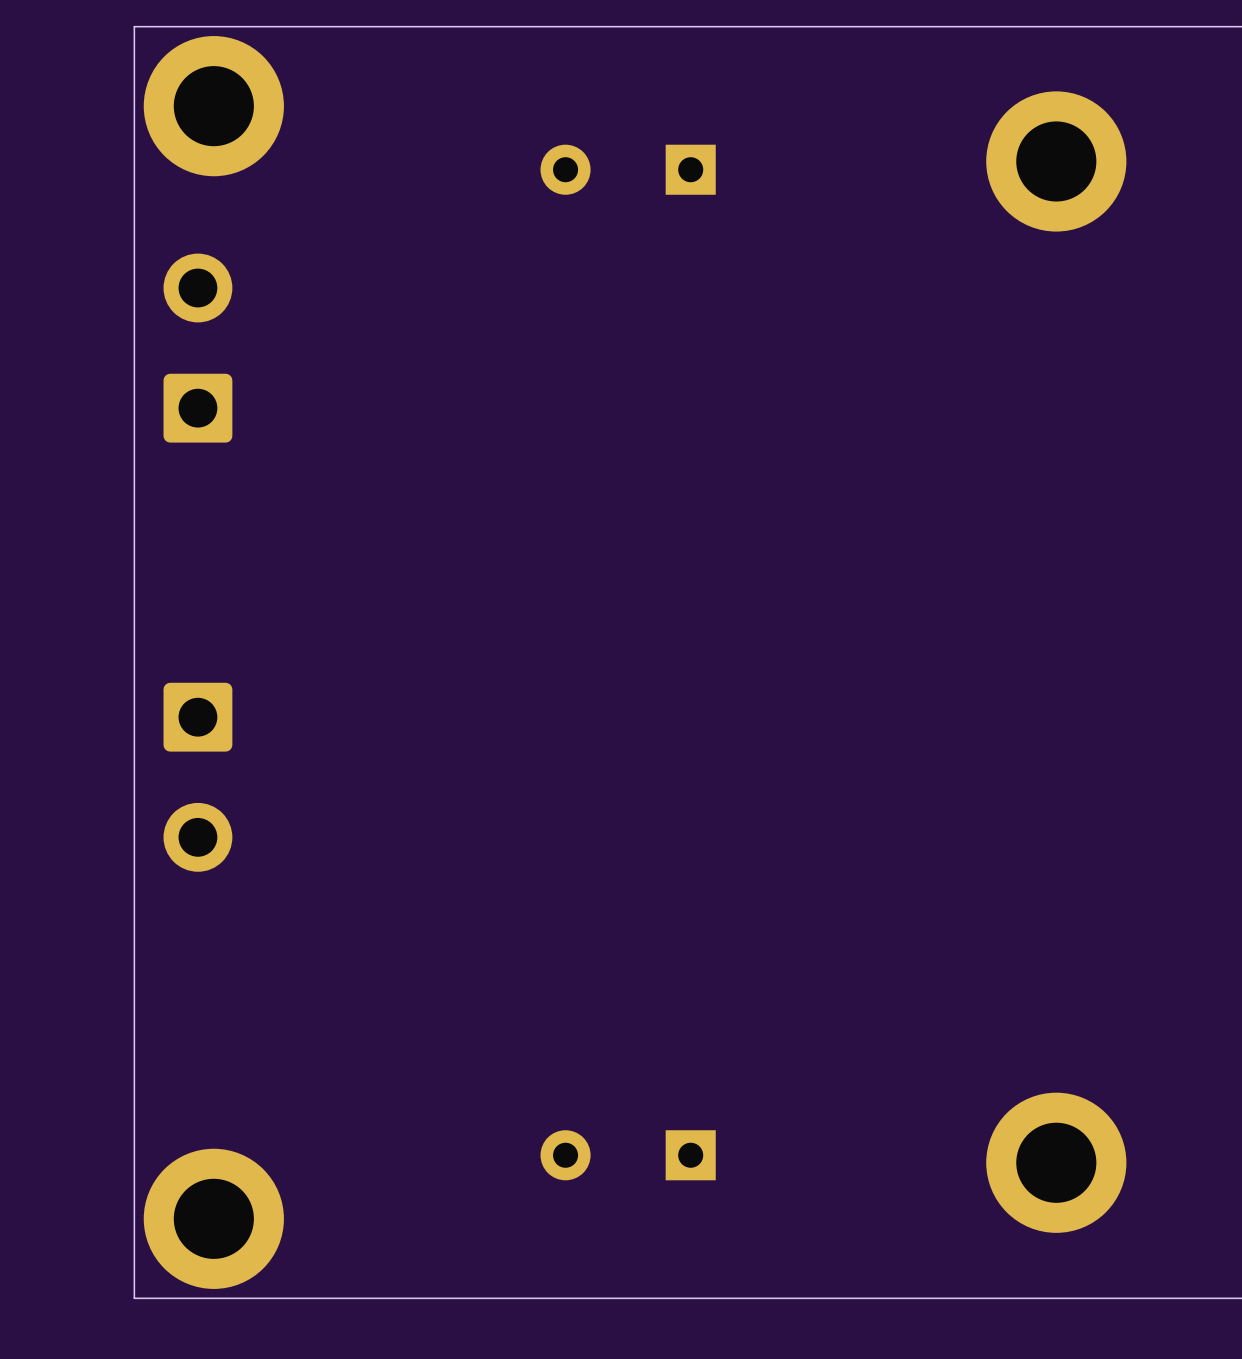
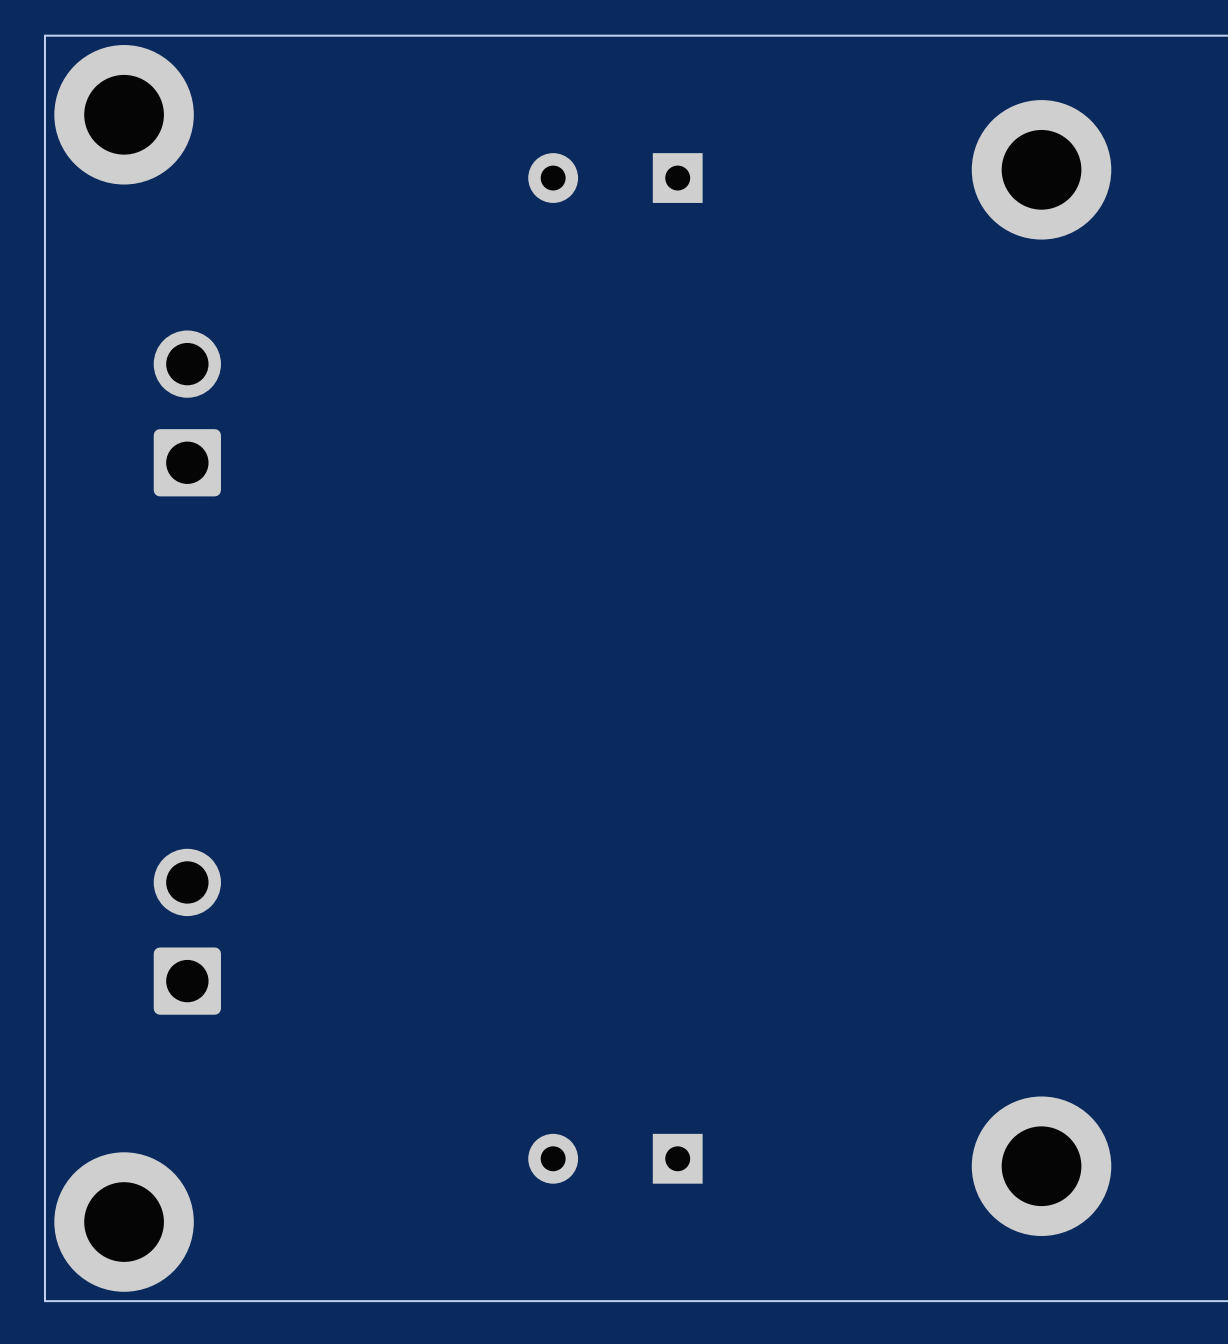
board edge: (134, 26) (134, 1298) -> (124, 35) (44, 35) (44, 1301) (124, 1301)
part position: (213, 106) -> (124, 114)
part: (197, 348) -> none
part: none -> (187, 413)
part: (197, 777) -> none
part: none -> (187, 931)
part position: (213, 1218) -> (124, 1222)

